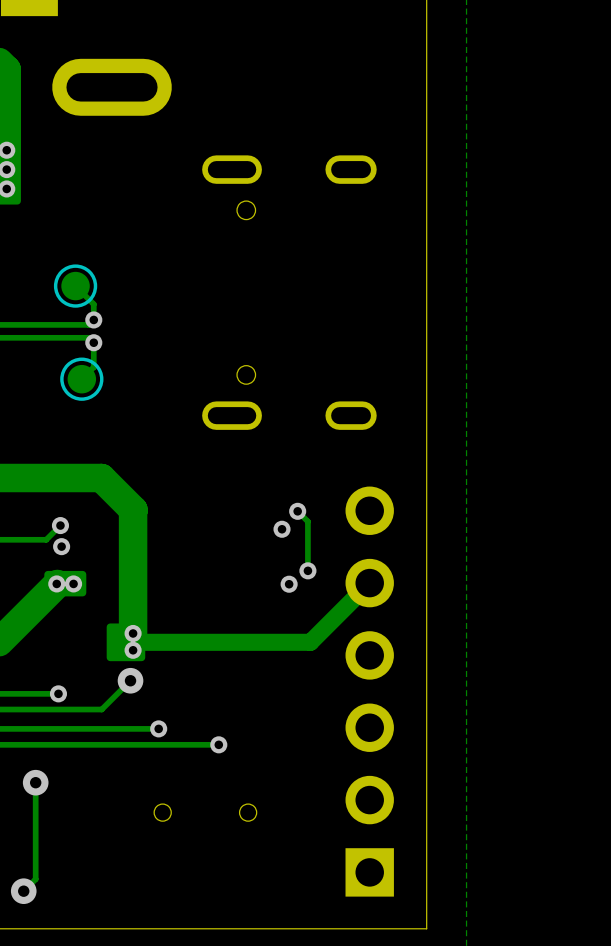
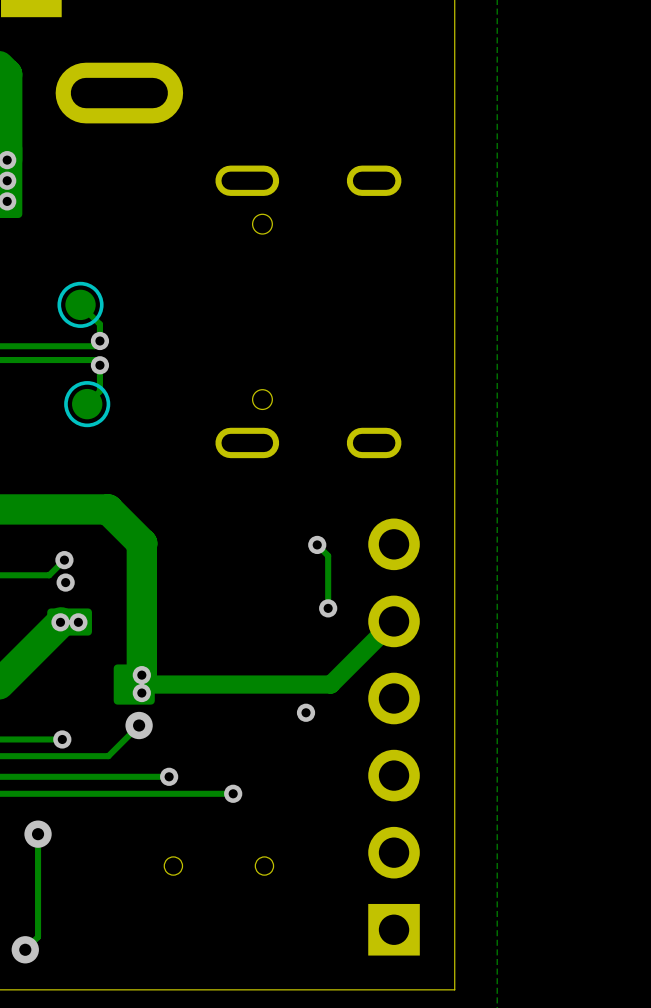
via: (282, 529) -> none
via: (289, 584) -> none
via: none -> (306, 712)

